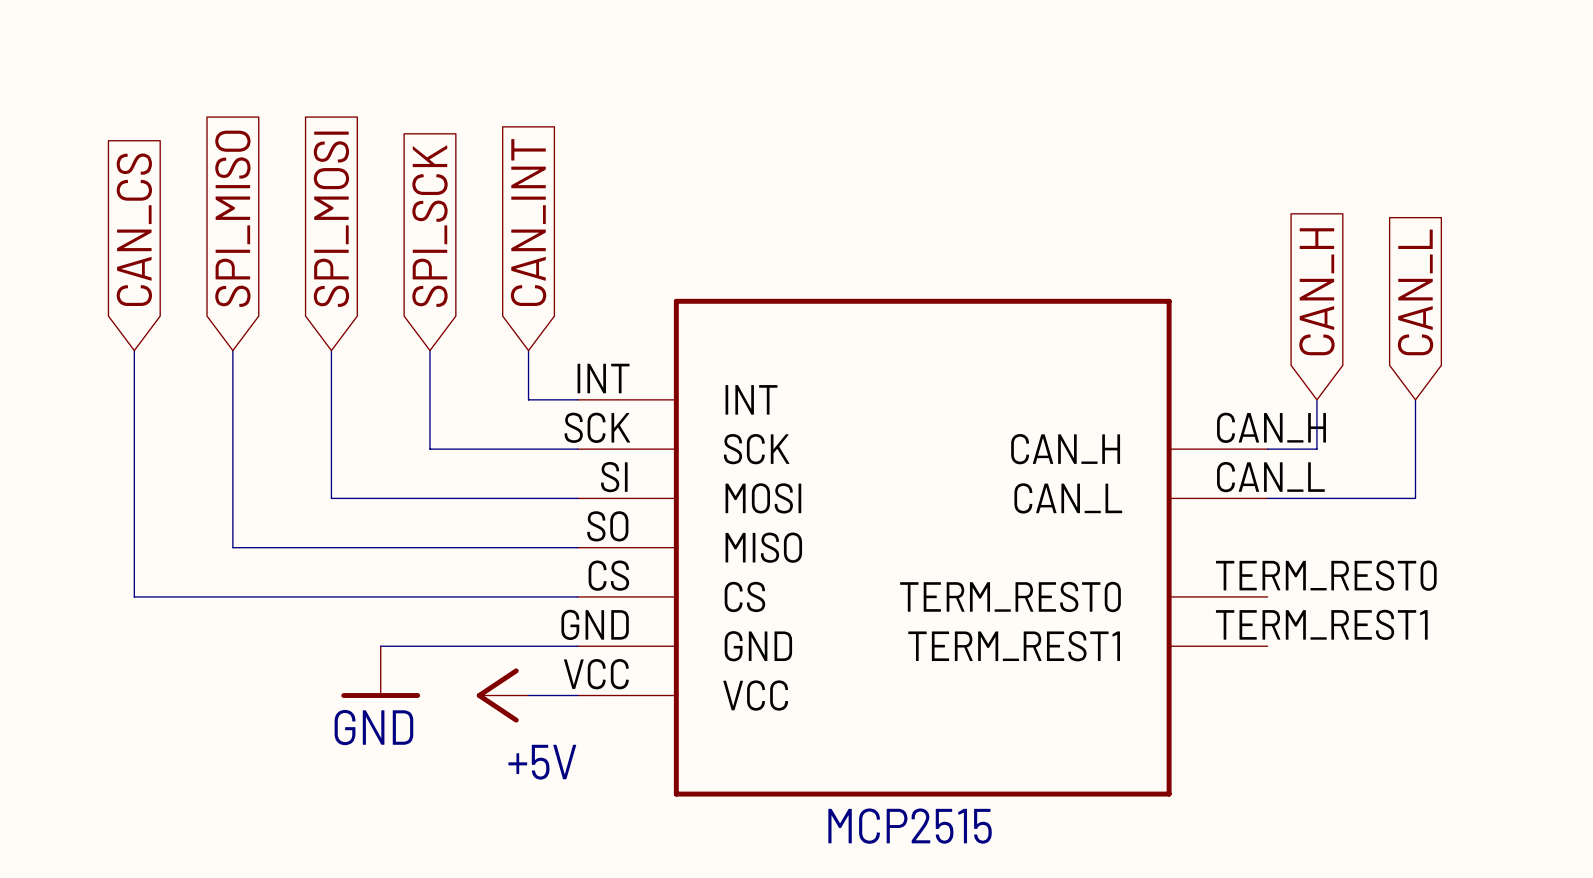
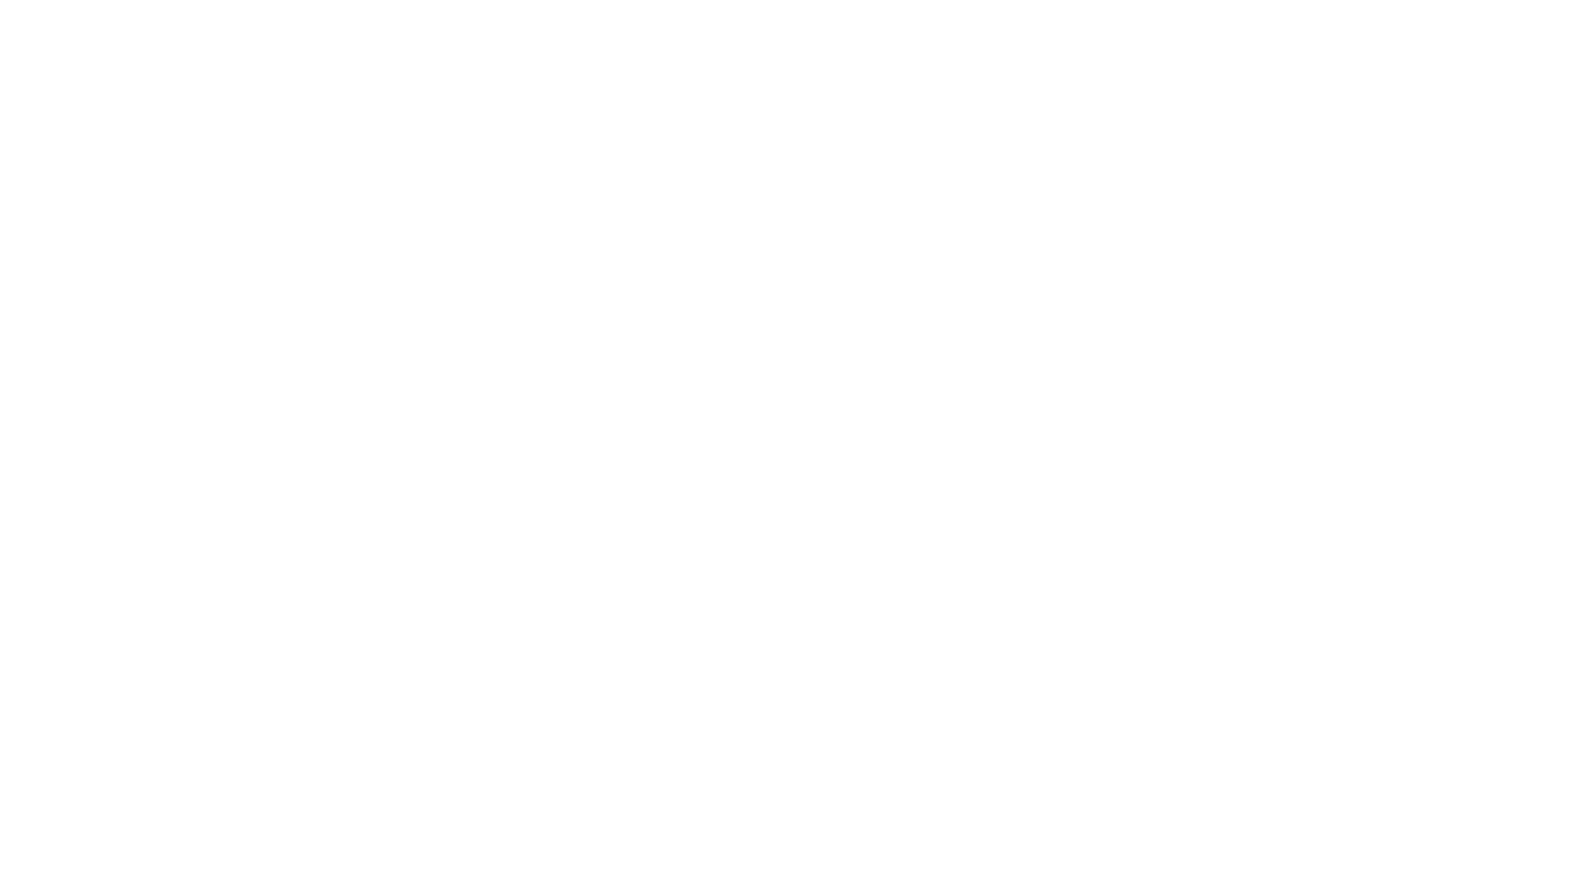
global label: SPI_MISO (232, 218) -> none
global label: SPI_MOSI (331, 219) -> none
global label: CAN_INT (528, 222) -> none
global label: SPI_SCK (430, 226) -> none
global label: CAN_CS (134, 229) -> none
global label: CAN_H (1316, 291) -> none
global label: CAN_L (1415, 292) -> none
wire: (134, 350) (134, 596) (577, 596) -> none
wire: (232, 350) (232, 547) (577, 547) -> none
wire: (331, 350) (331, 498) (577, 498) -> none
wire: (429, 350) (429, 449) (577, 449) -> none
wire: (528, 350) (528, 399) (577, 399) -> none
wire: (1316, 399) (1316, 449) (1267, 449) -> none
wire: (1415, 399) (1415, 498) (1267, 498) -> none
part: (922, 547) -> none
wire: (380, 646) (577, 646) -> none
power symbol: GND (380, 672) -> none
power symbol: +5V (502, 695) -> none
wire: (528, 695) (577, 695) -> none

